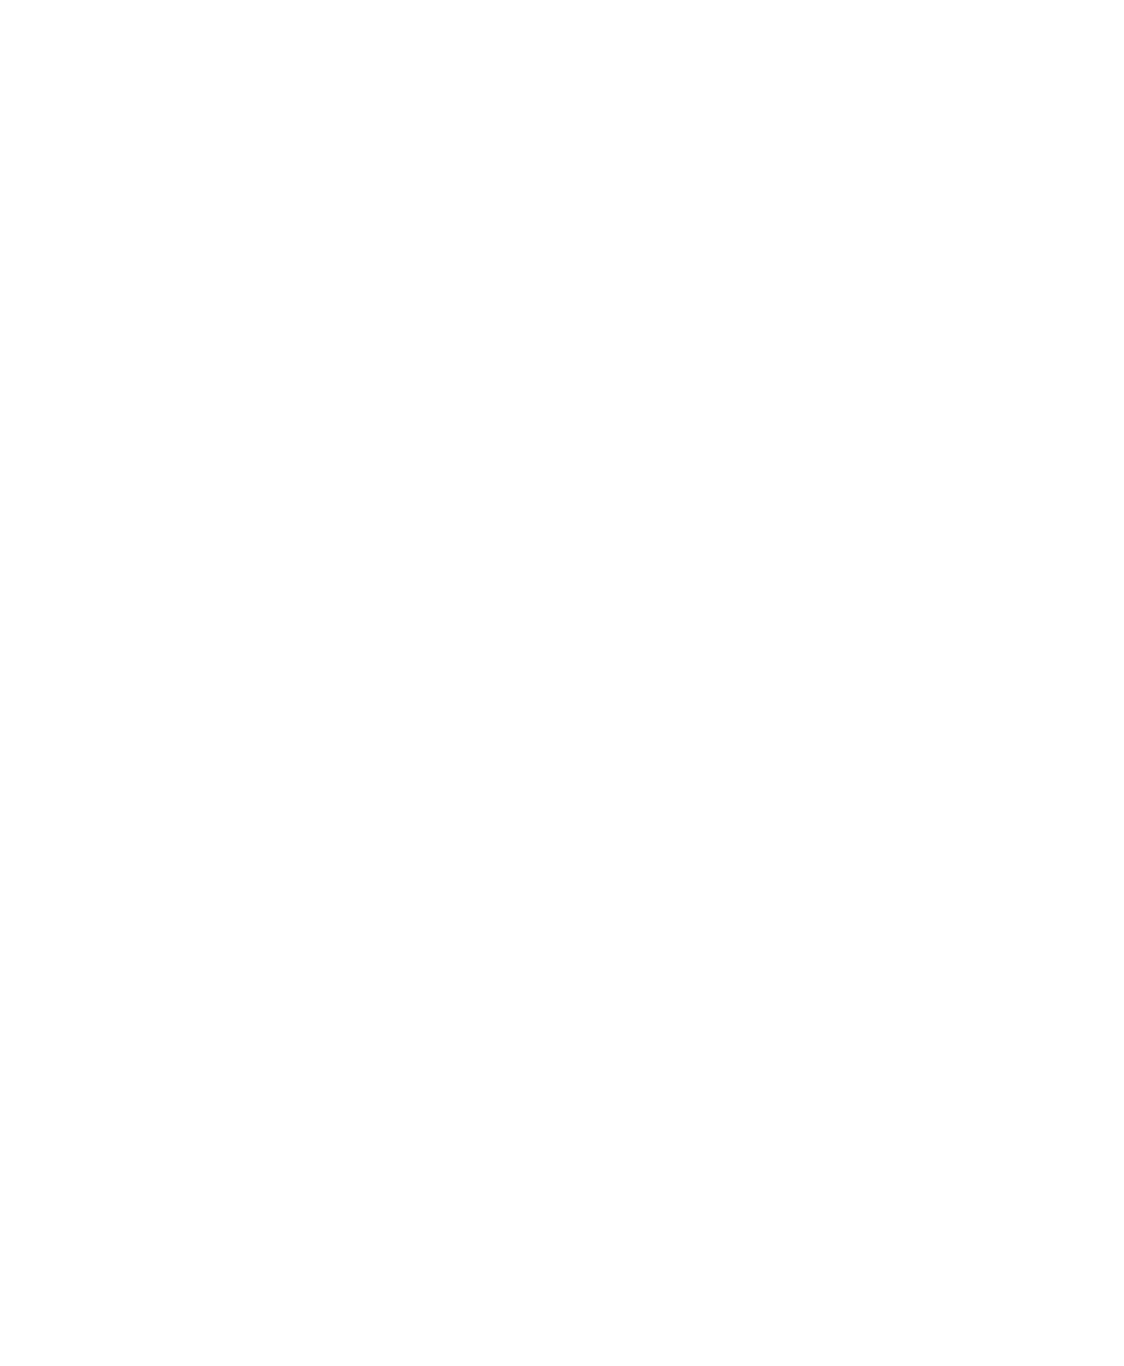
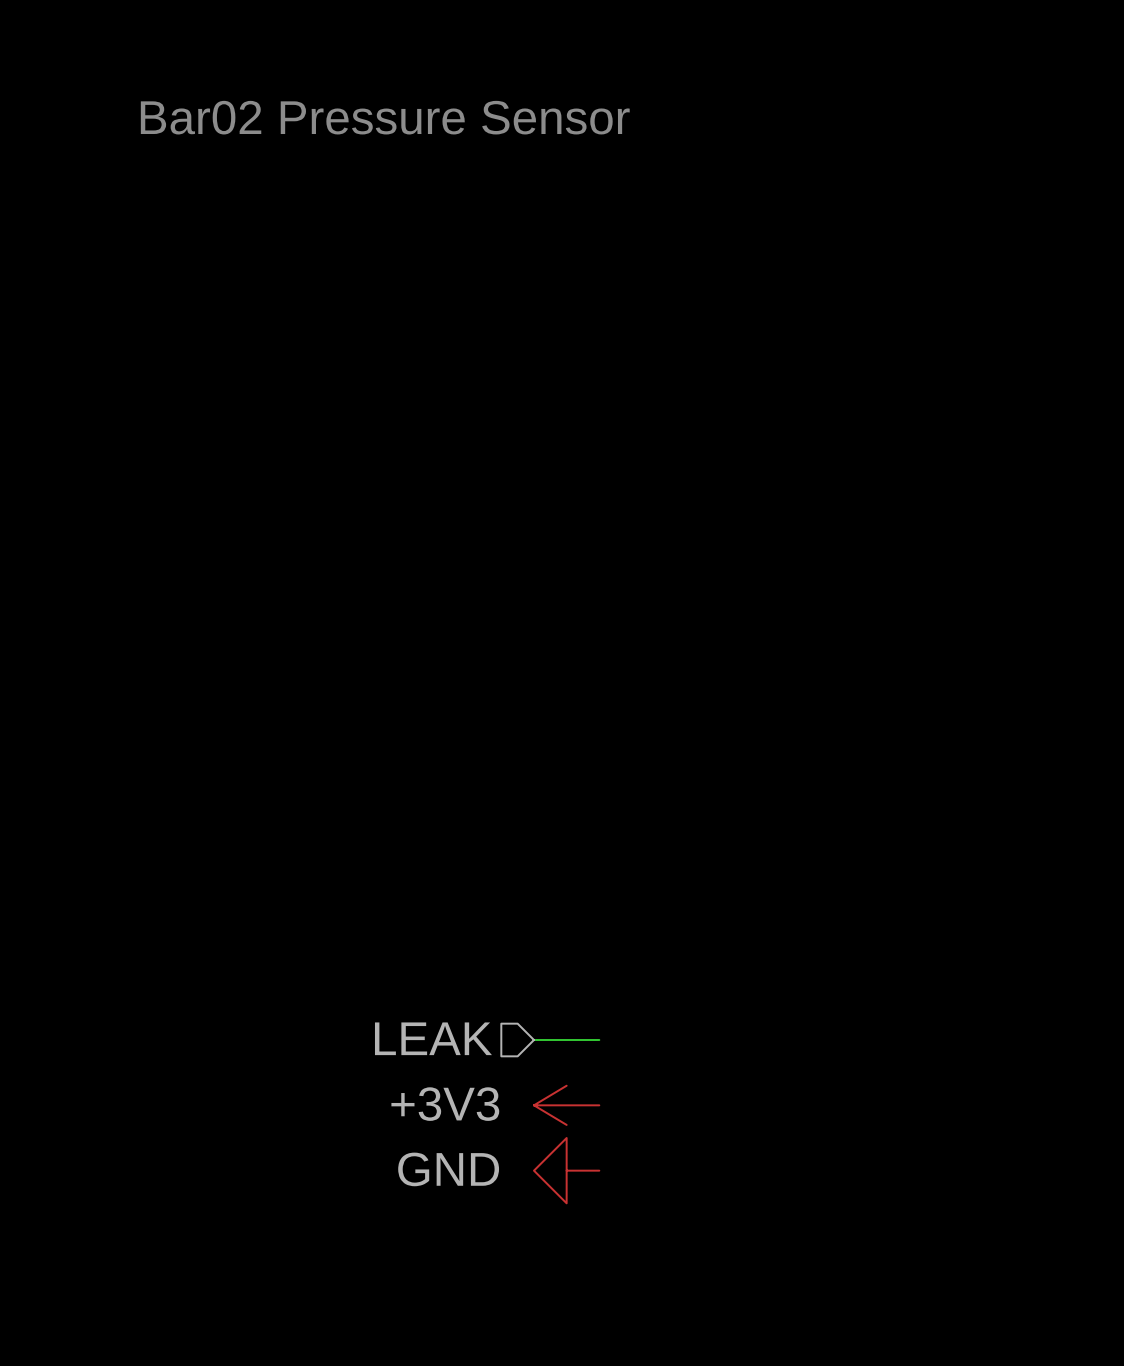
text: none -> Bar02 Pressure Sensor (385, 117)
hierarchical label: none -> LEAK (433, 1038)
wire: none -> (533, 1040) (599, 1040)
power symbol: none -> +3V3 (566, 1105)
power symbol: none -> GND (566, 1170)

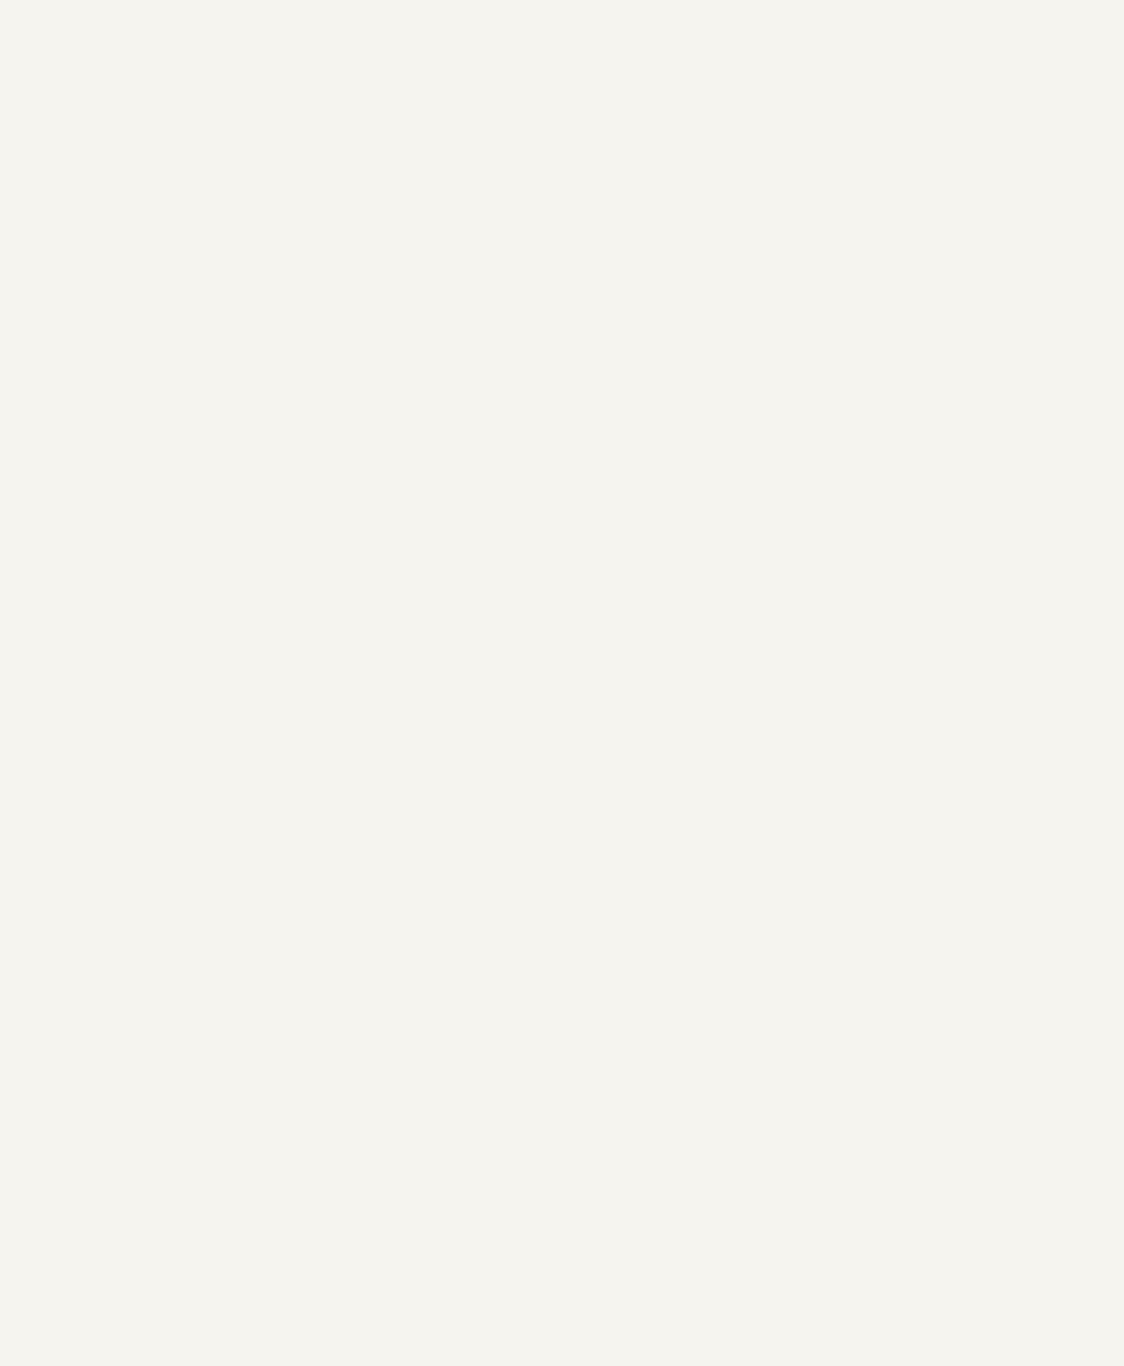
text: Bar02 Pressure Sensor (385, 117) -> none
hierarchical label: LEAK (433, 1038) -> none
wire: (533, 1040) (599, 1040) -> none
power symbol: +3V3 (566, 1105) -> none
power symbol: GND (566, 1170) -> none

